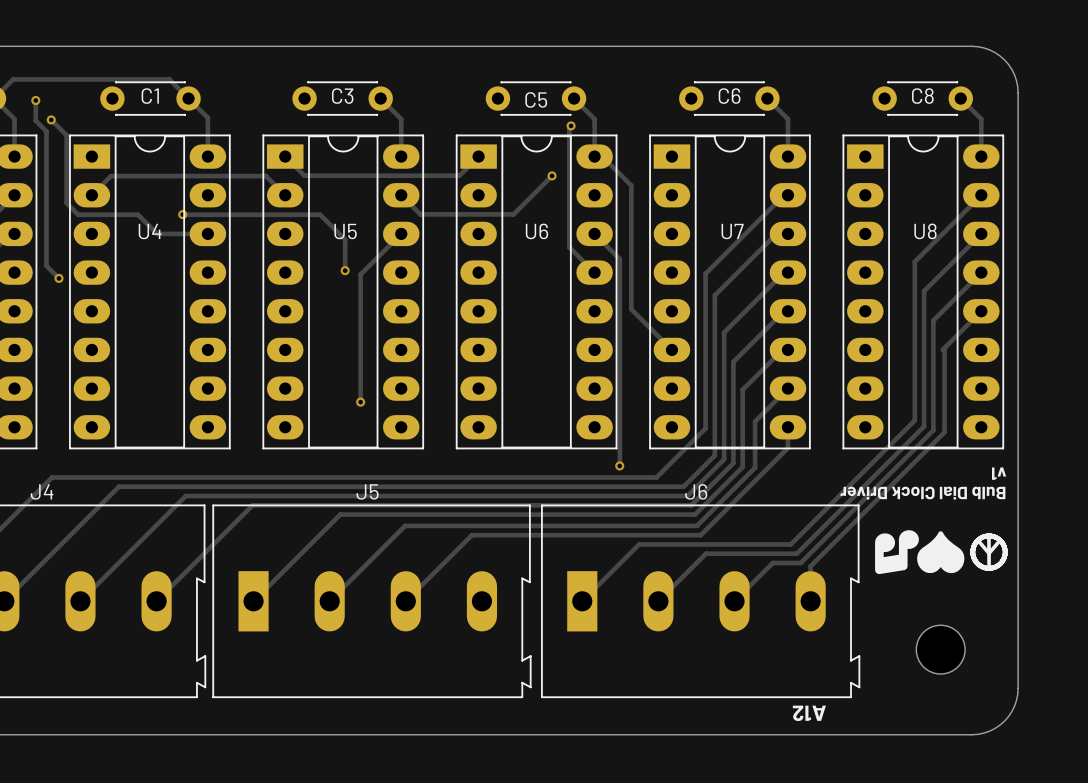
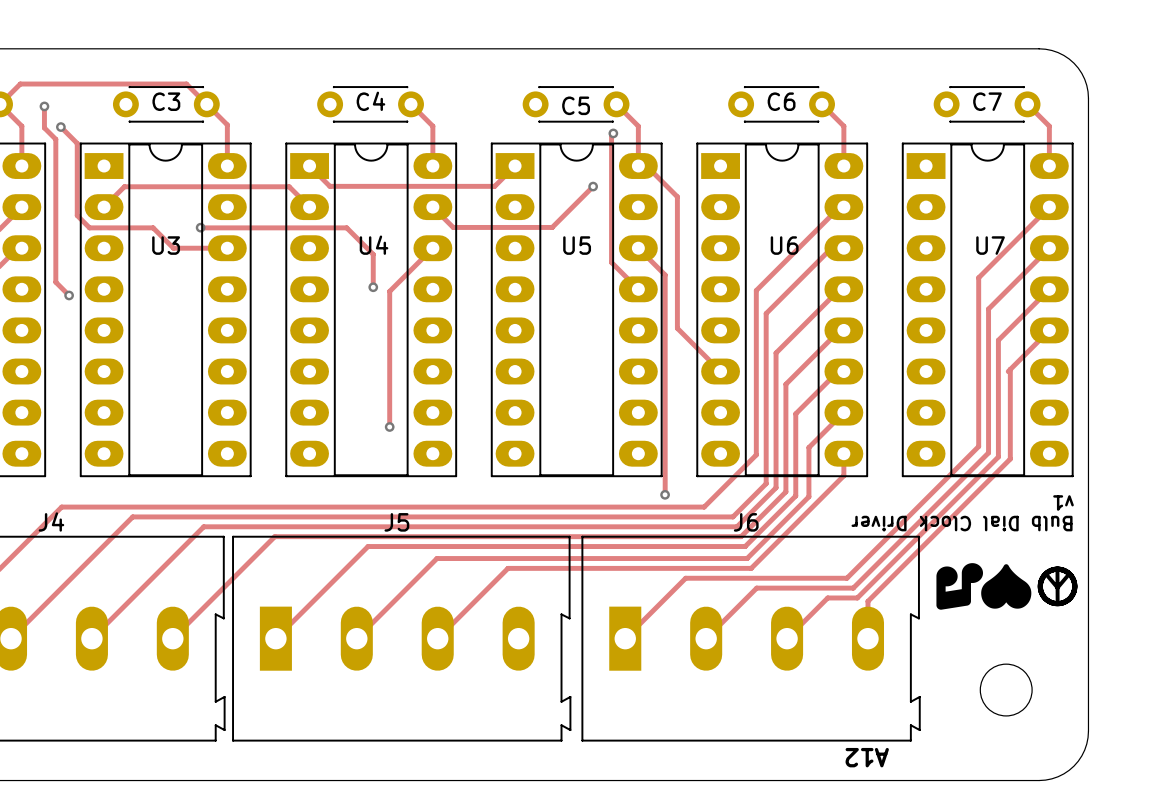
C1 name: C1 (150, 96) -> C3 (166, 101)
C3 name: C3 (342, 96) -> C4 (370, 101)
C8 name: C8 (922, 96) -> C7 (987, 101)
U4 name: U4 (150, 231) -> U3 (166, 245)
U5 name: U5 (345, 231) -> U4 (374, 245)
U6 name: U6 (536, 231) -> U5 (577, 245)
U7 name: U7 (732, 231) -> U6 (784, 245)
U8 name: U8 (925, 231) -> U7 (990, 245)

